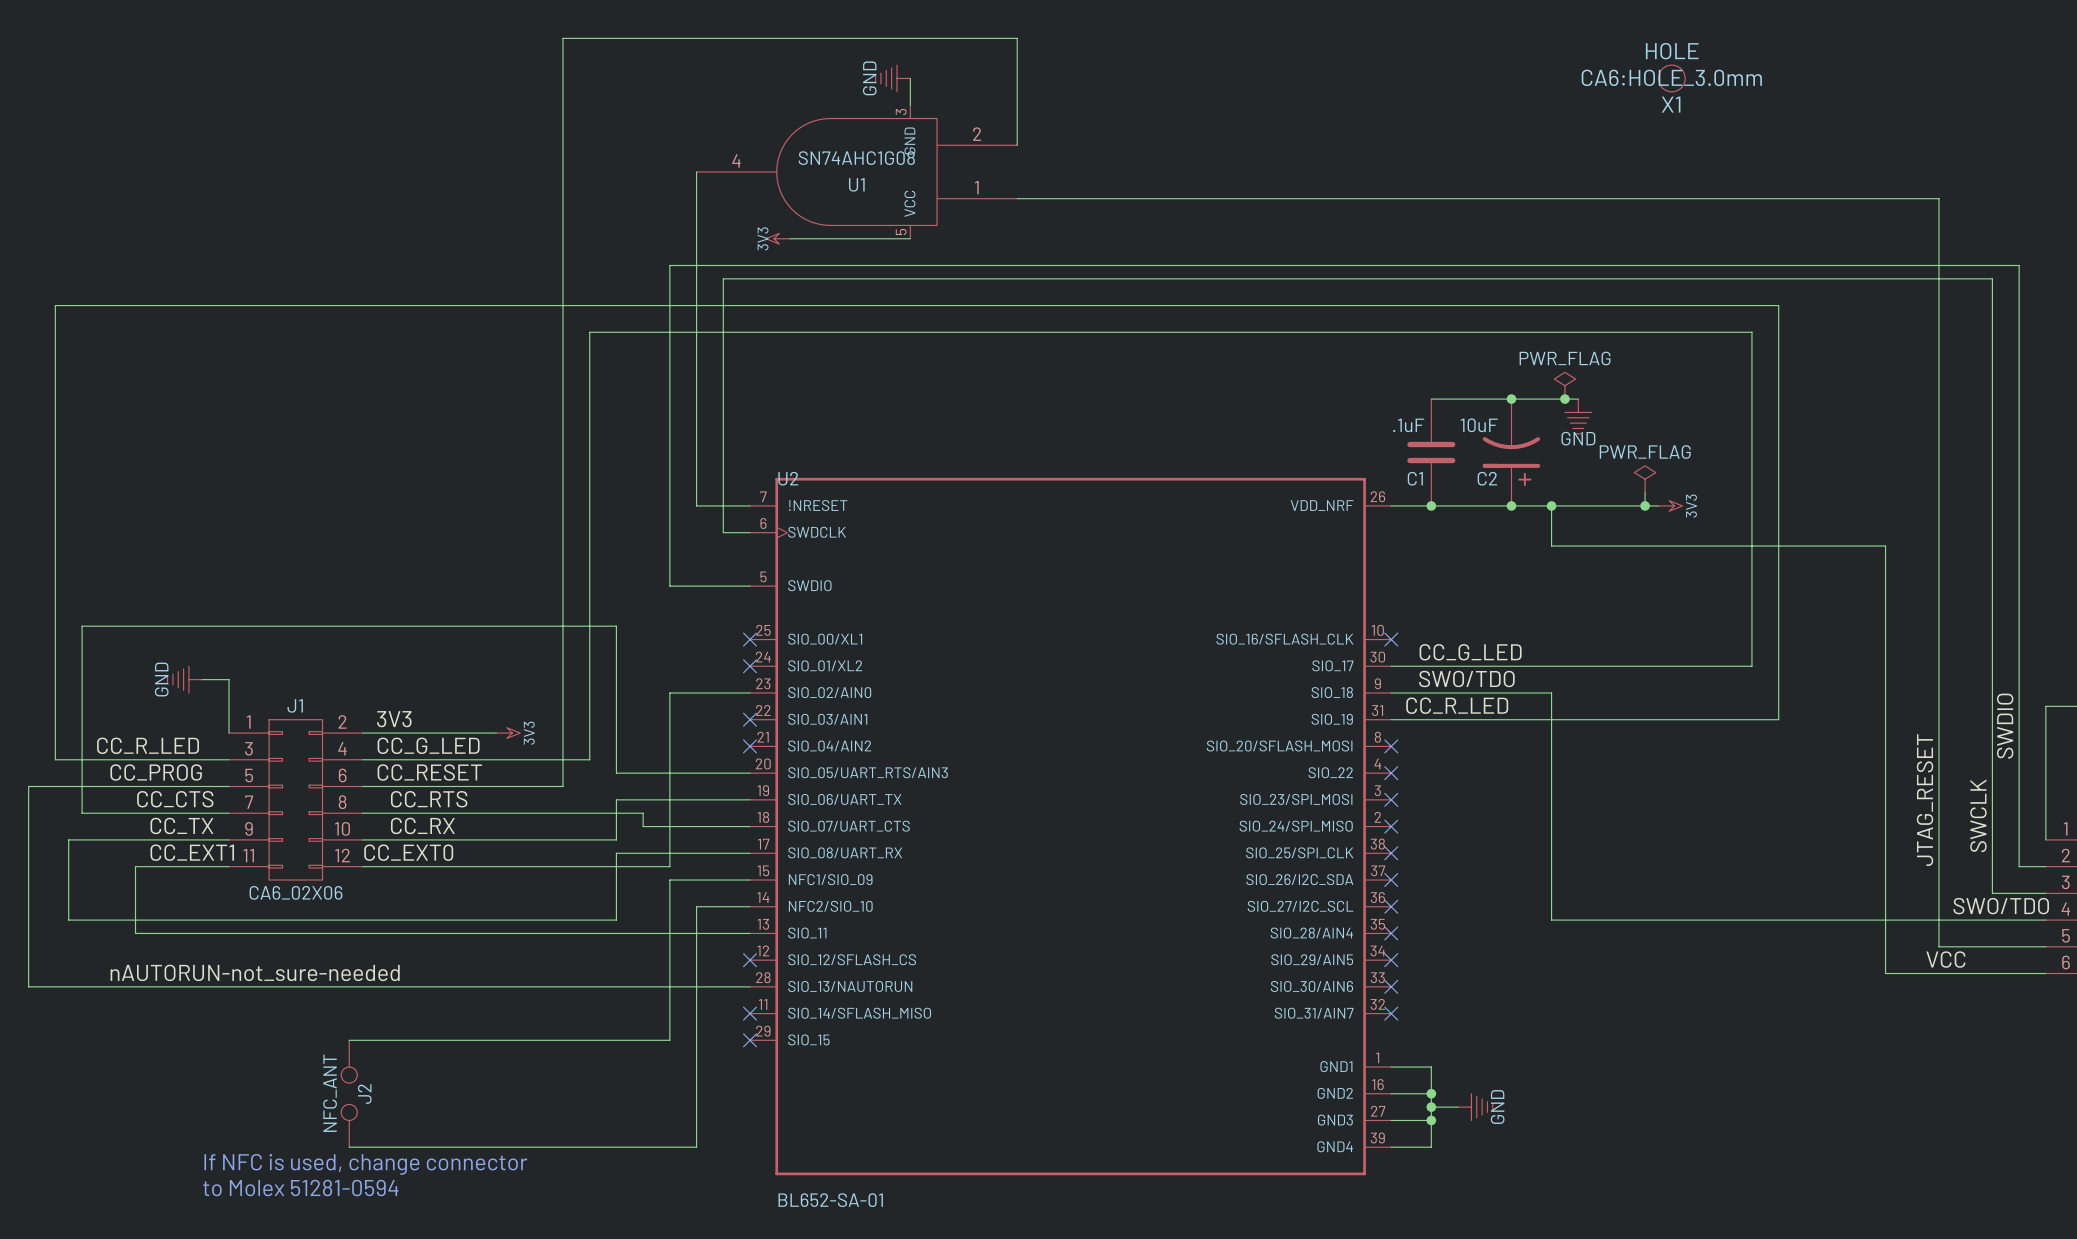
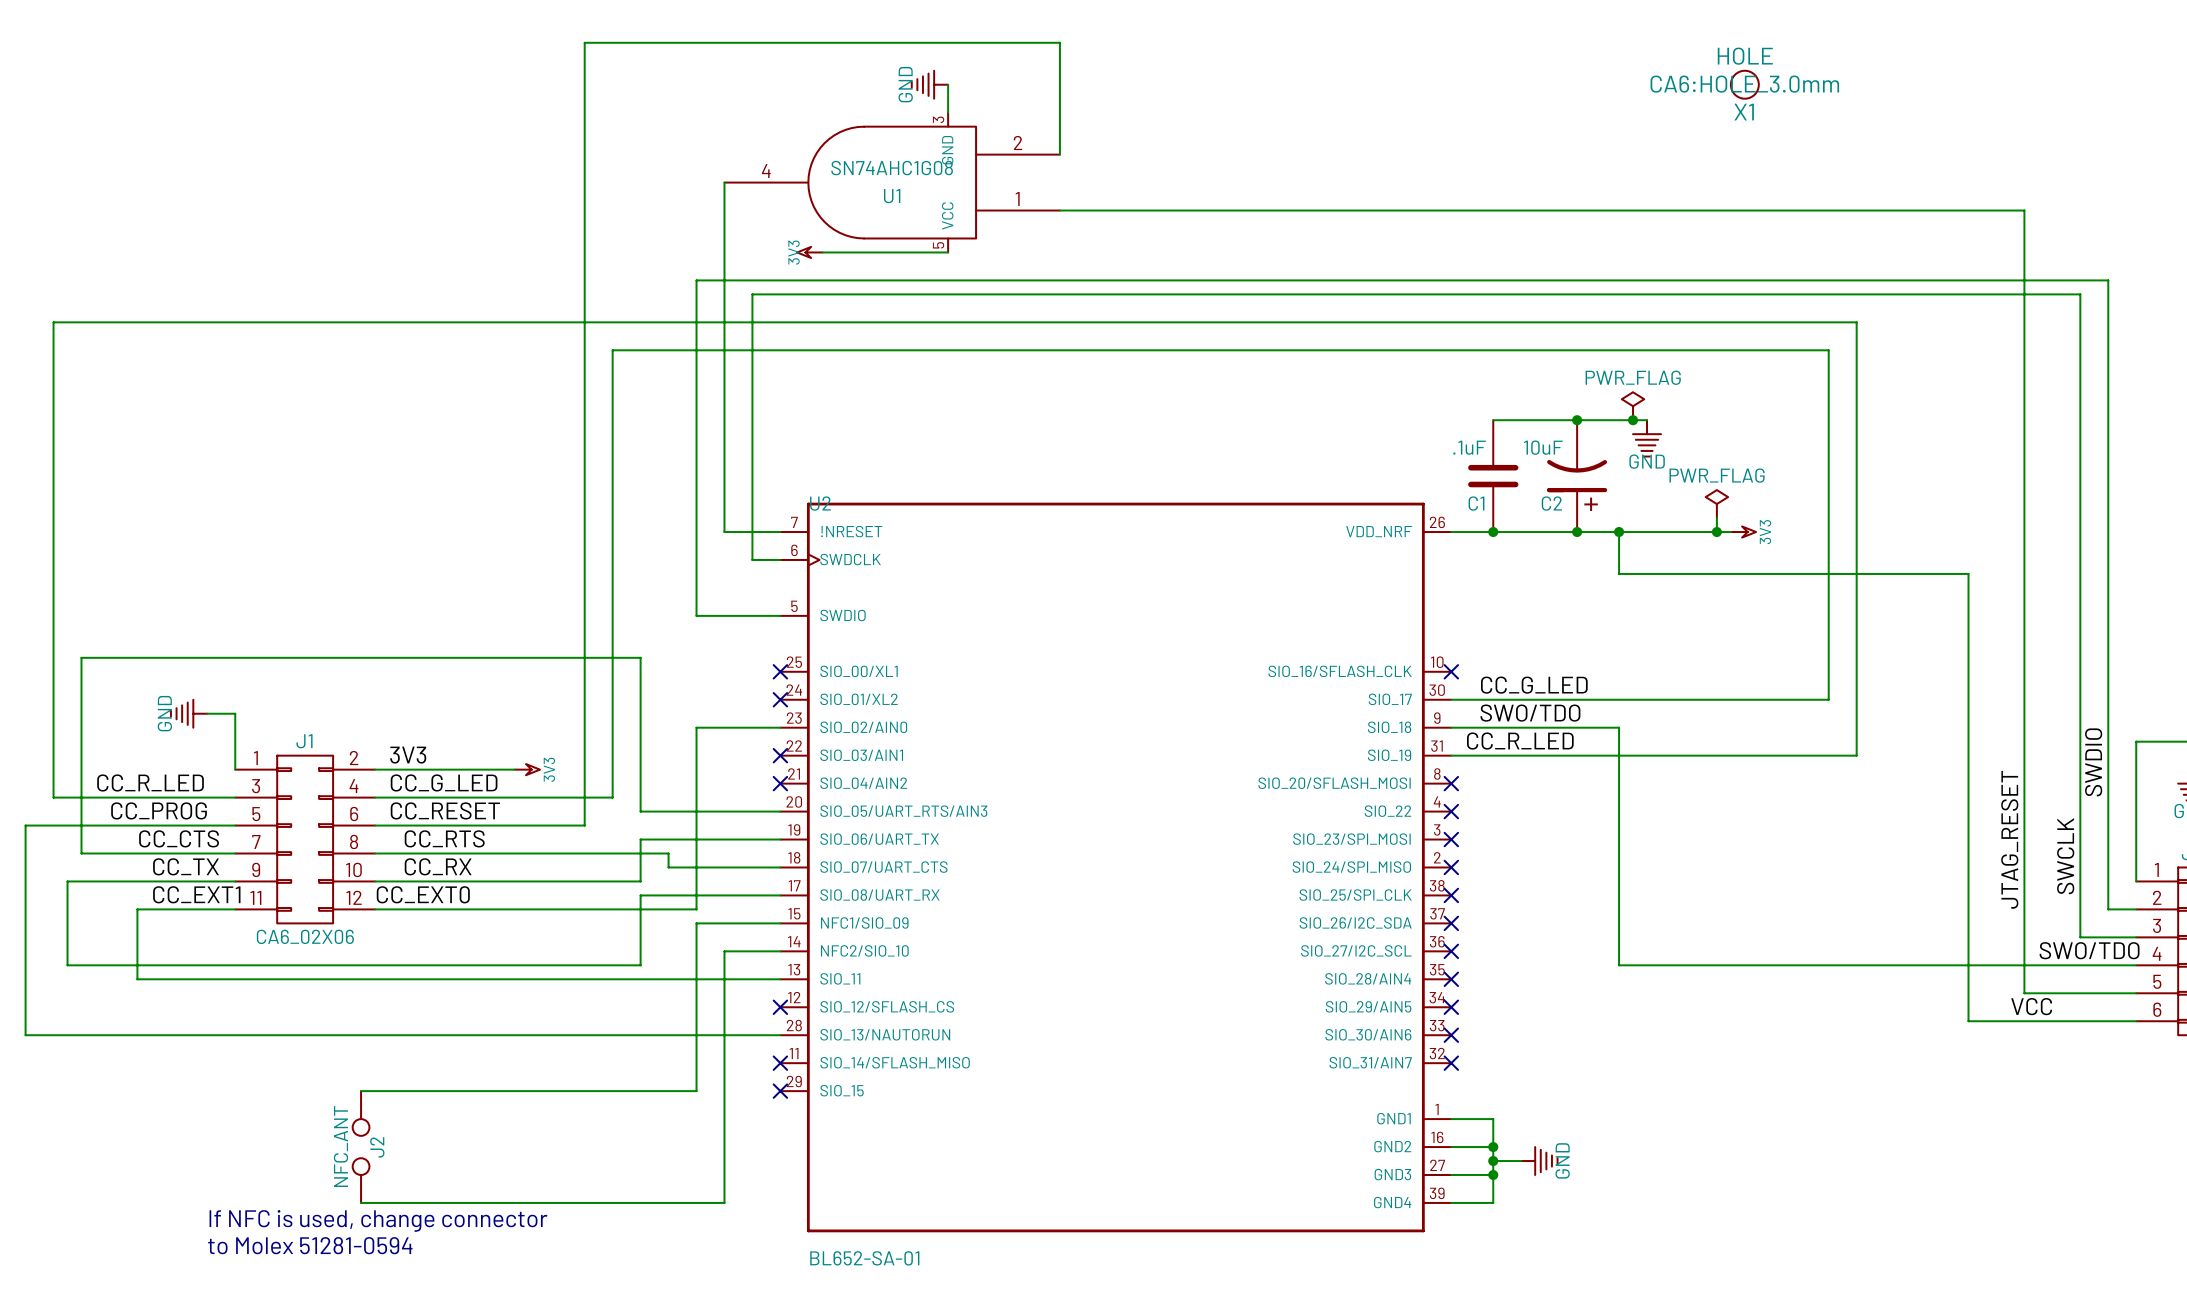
label: nAUTORUN-not_sure-needed (255, 972) -> none

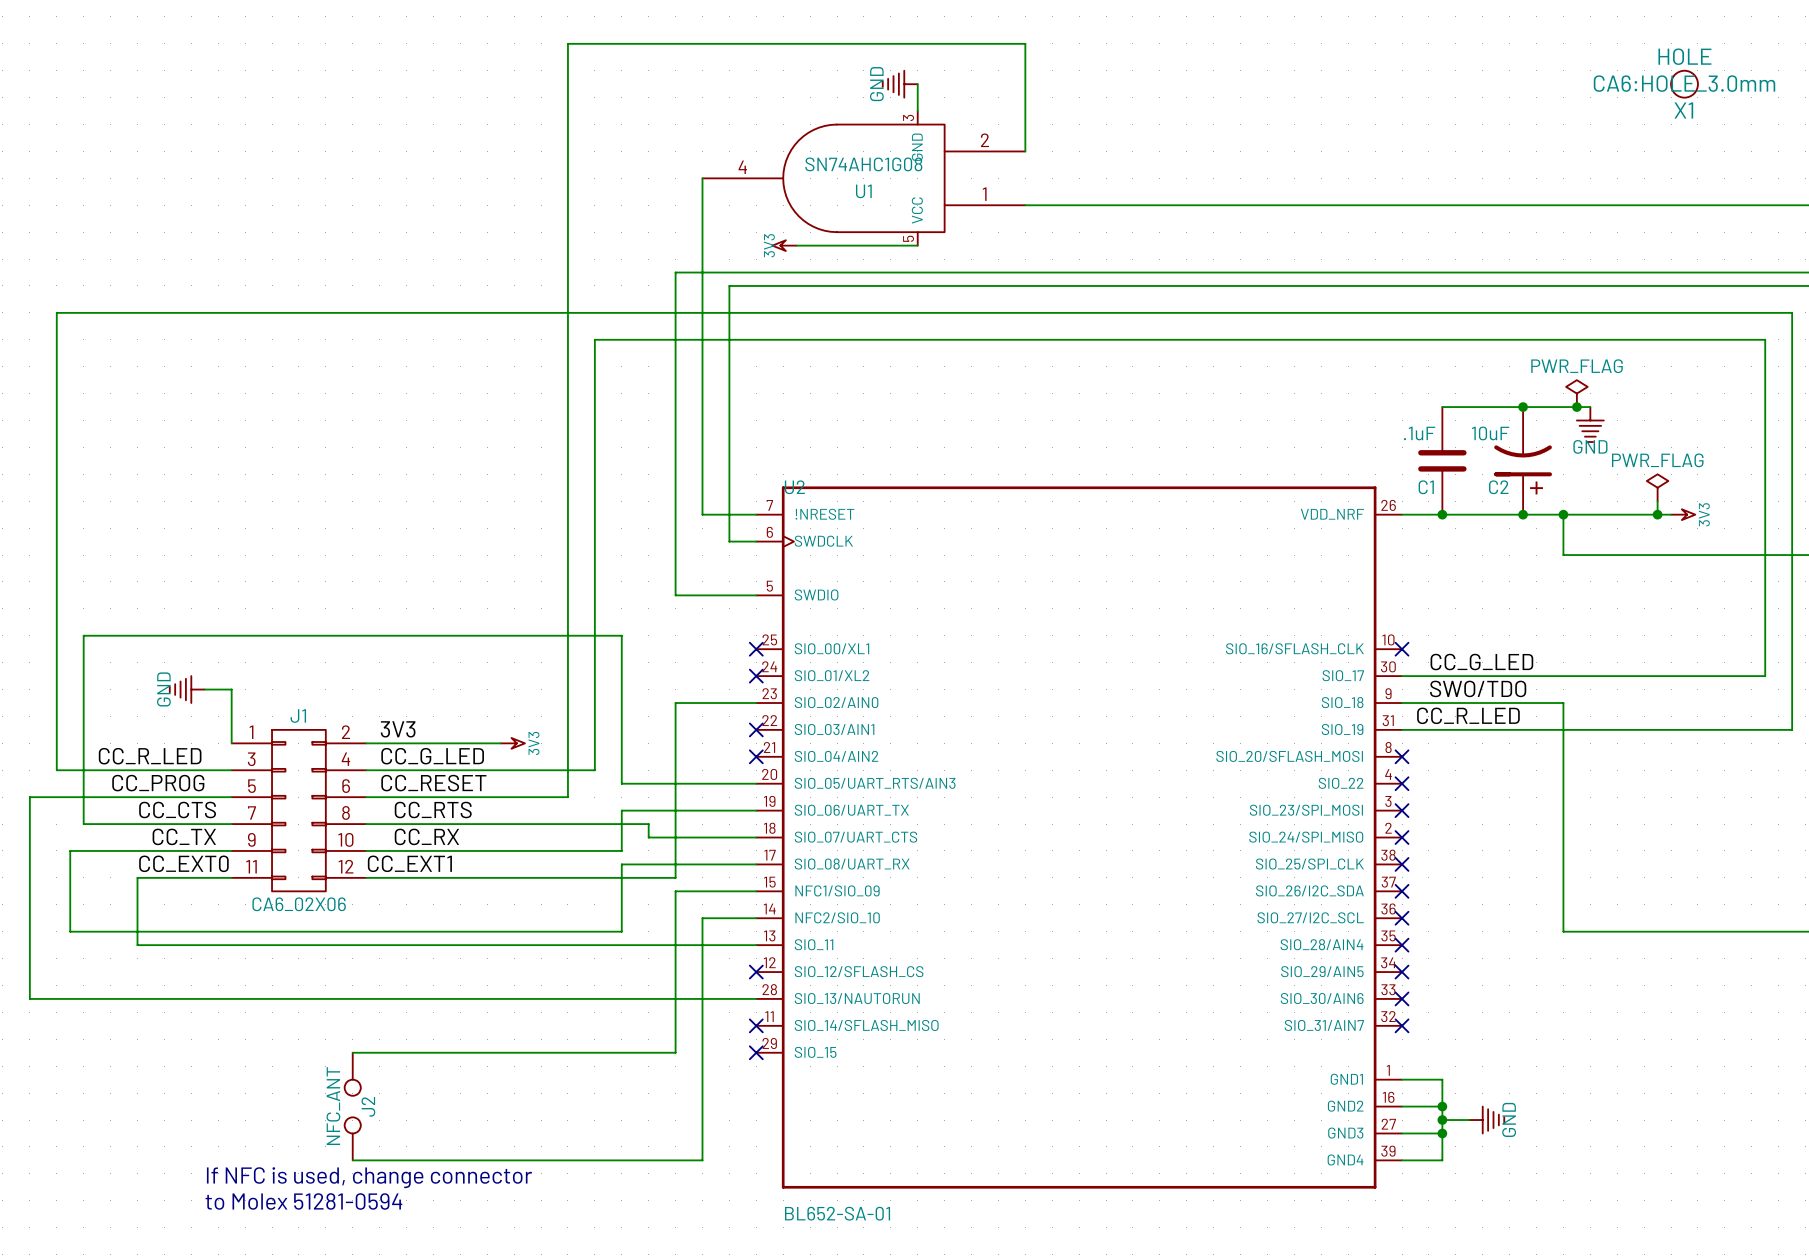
label: CC_EXT1 (196, 894) -> CC_EXT0 (183, 863)
label: CC_EXT0 (423, 894) -> CC_EXT1 (409, 863)

